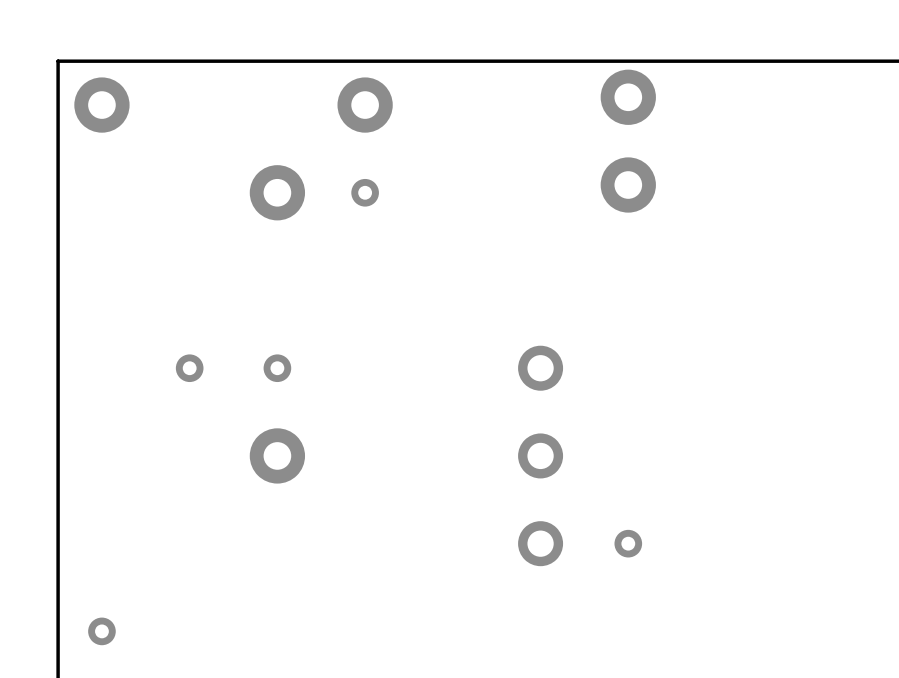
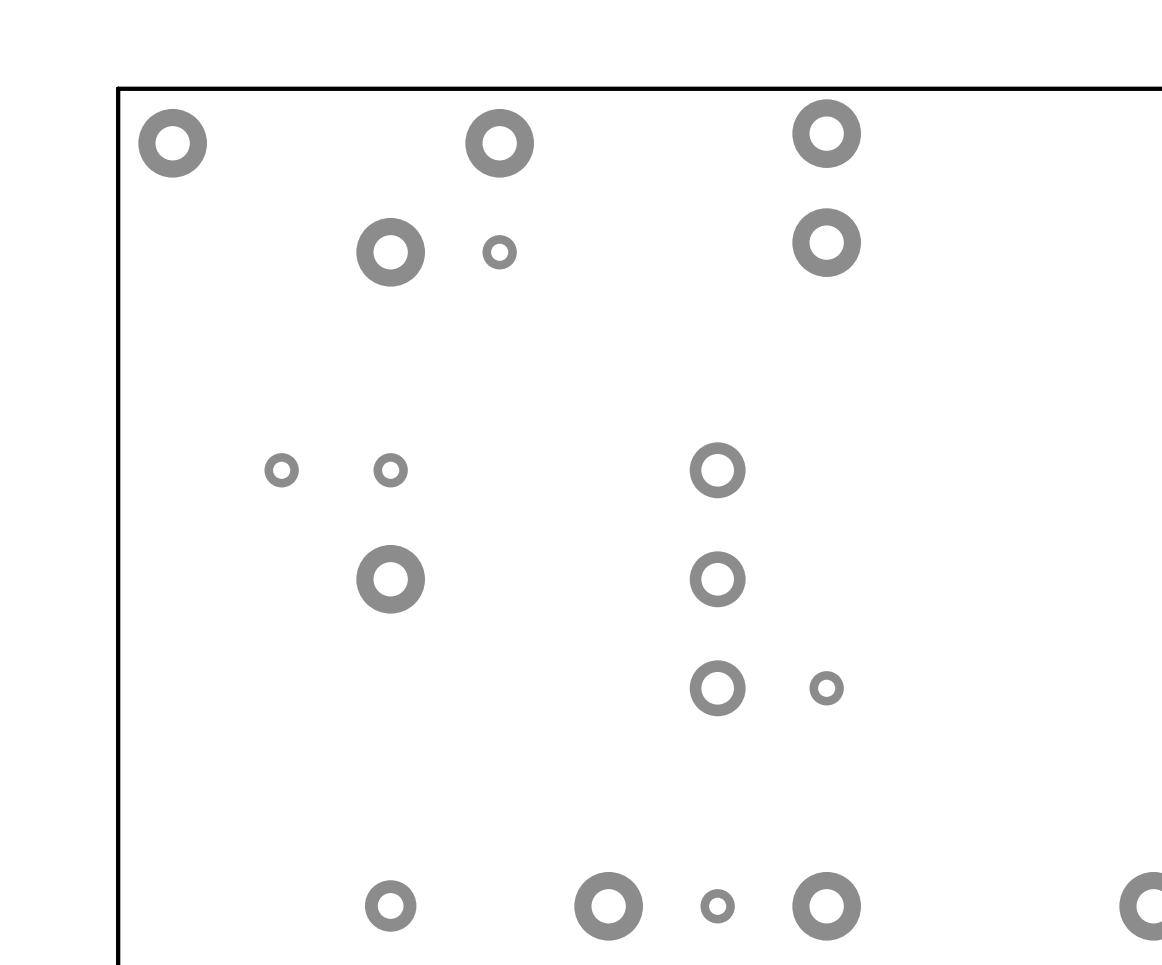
via: (101, 631) -> none

